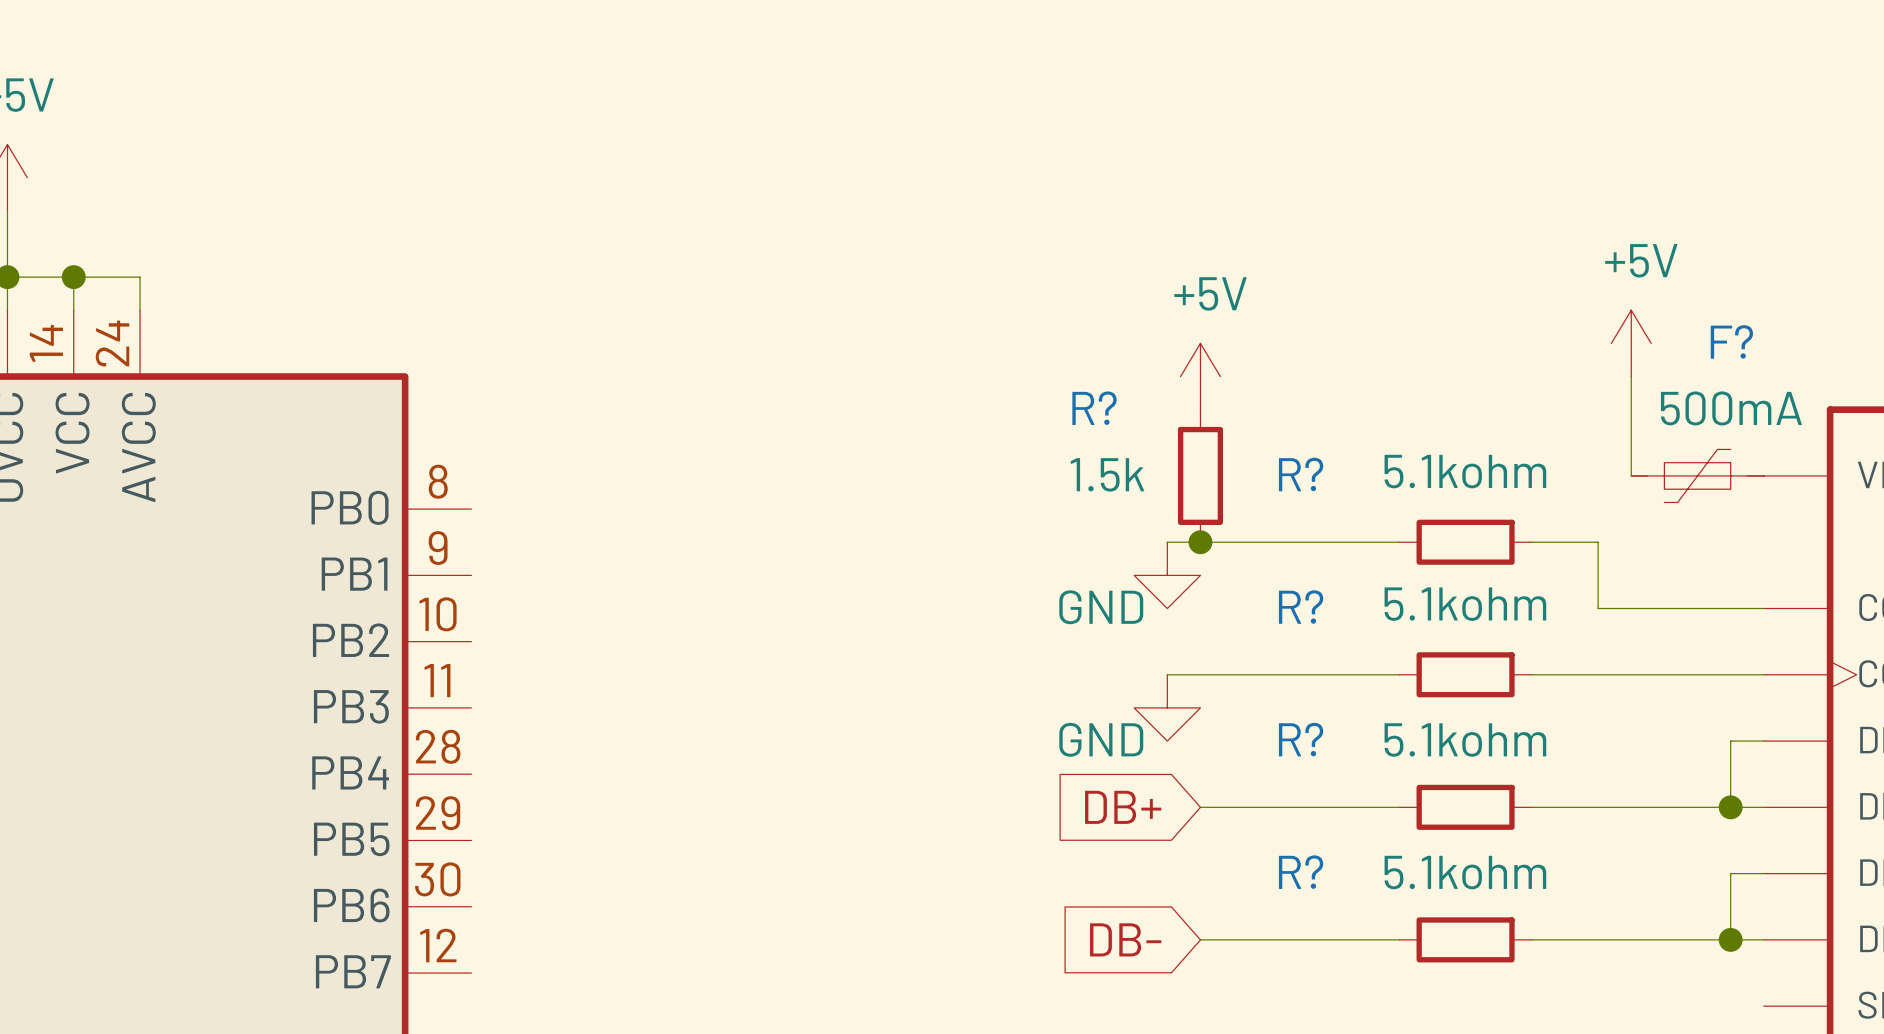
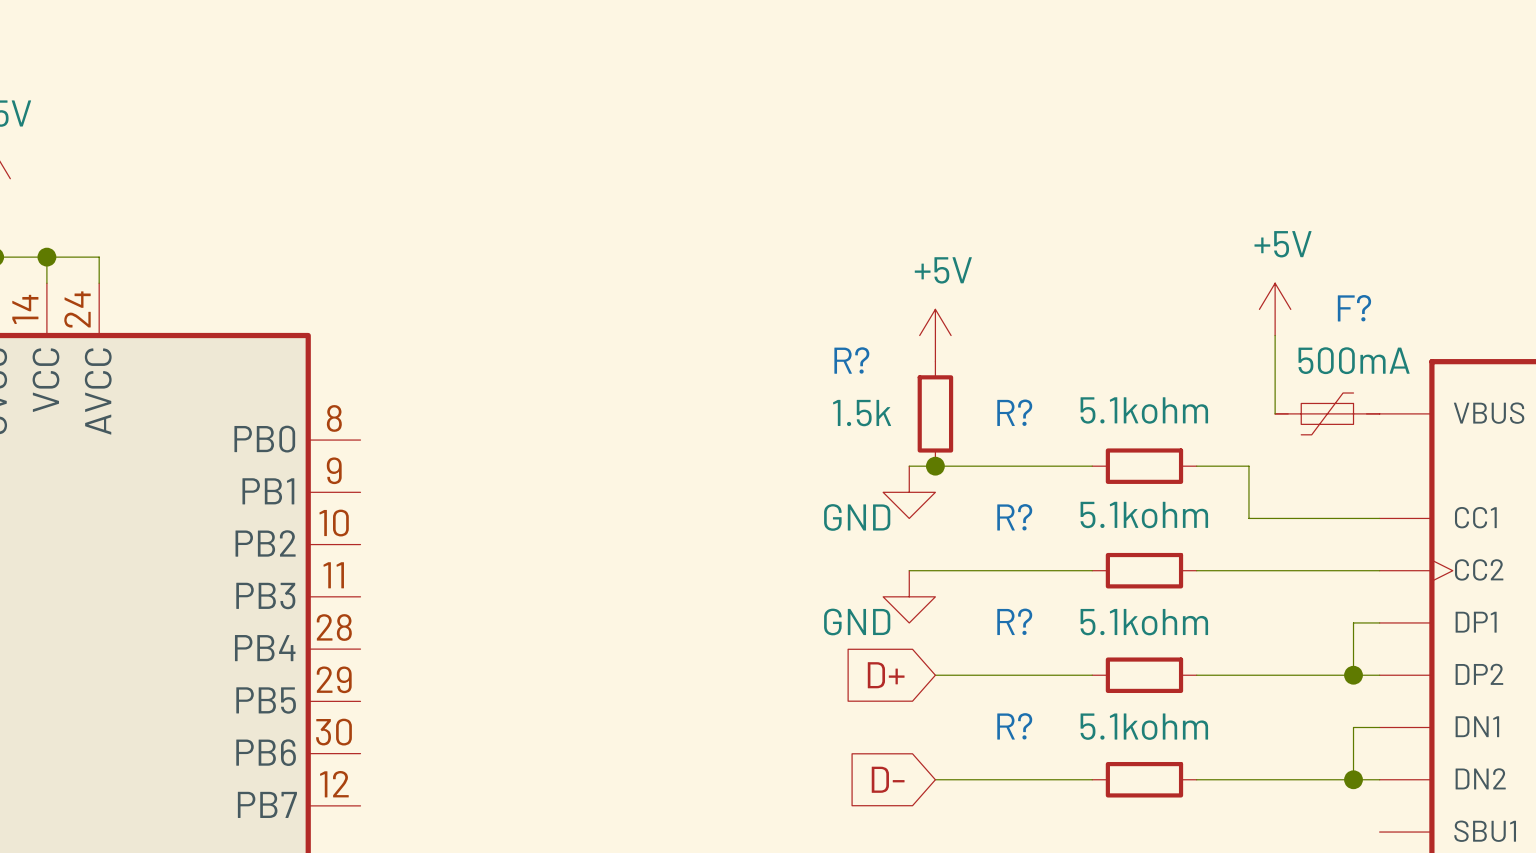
global label: DB+ (1123, 807) -> D+ (886, 675)
global label: DB- (1125, 939) -> D- (888, 779)

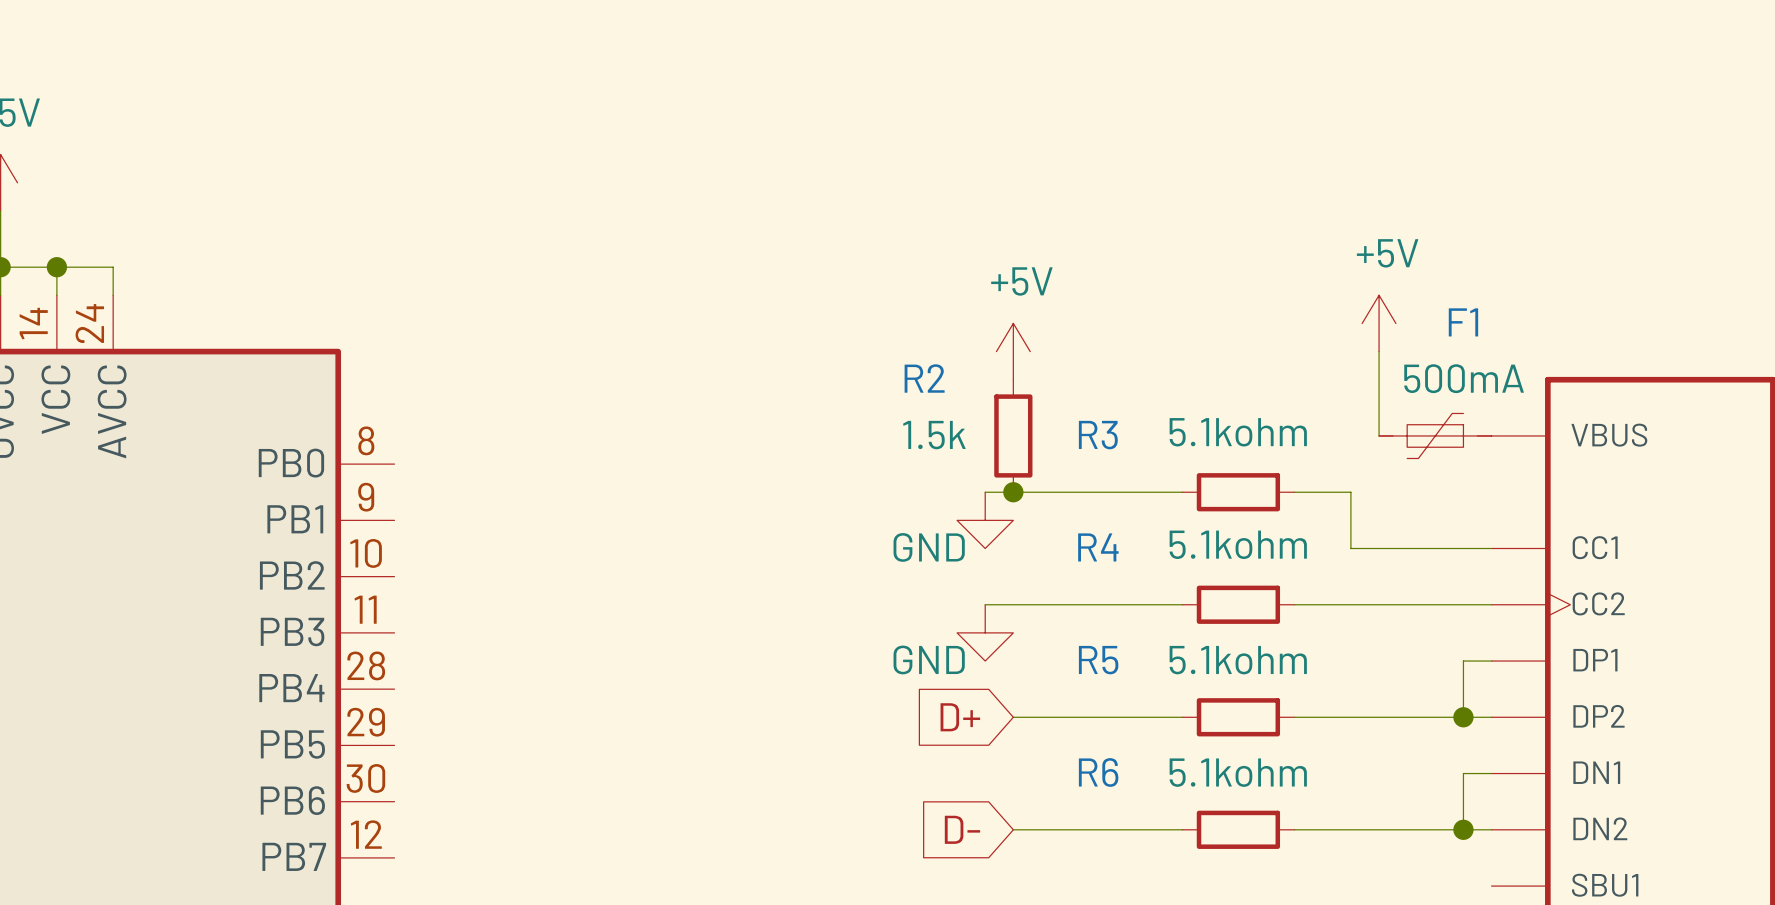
F? name: F? (1354, 308) -> F1 (1463, 322)
R? name: R? (851, 360) -> R2 (924, 378)
R? name: R? (1014, 412) -> R3 (1098, 435)
R? name: R? (1014, 517) -> R4 (1098, 547)
R? name: R? (1014, 621) -> R5 (1098, 660)
R? name: R? (1014, 726) -> R6 (1098, 772)

